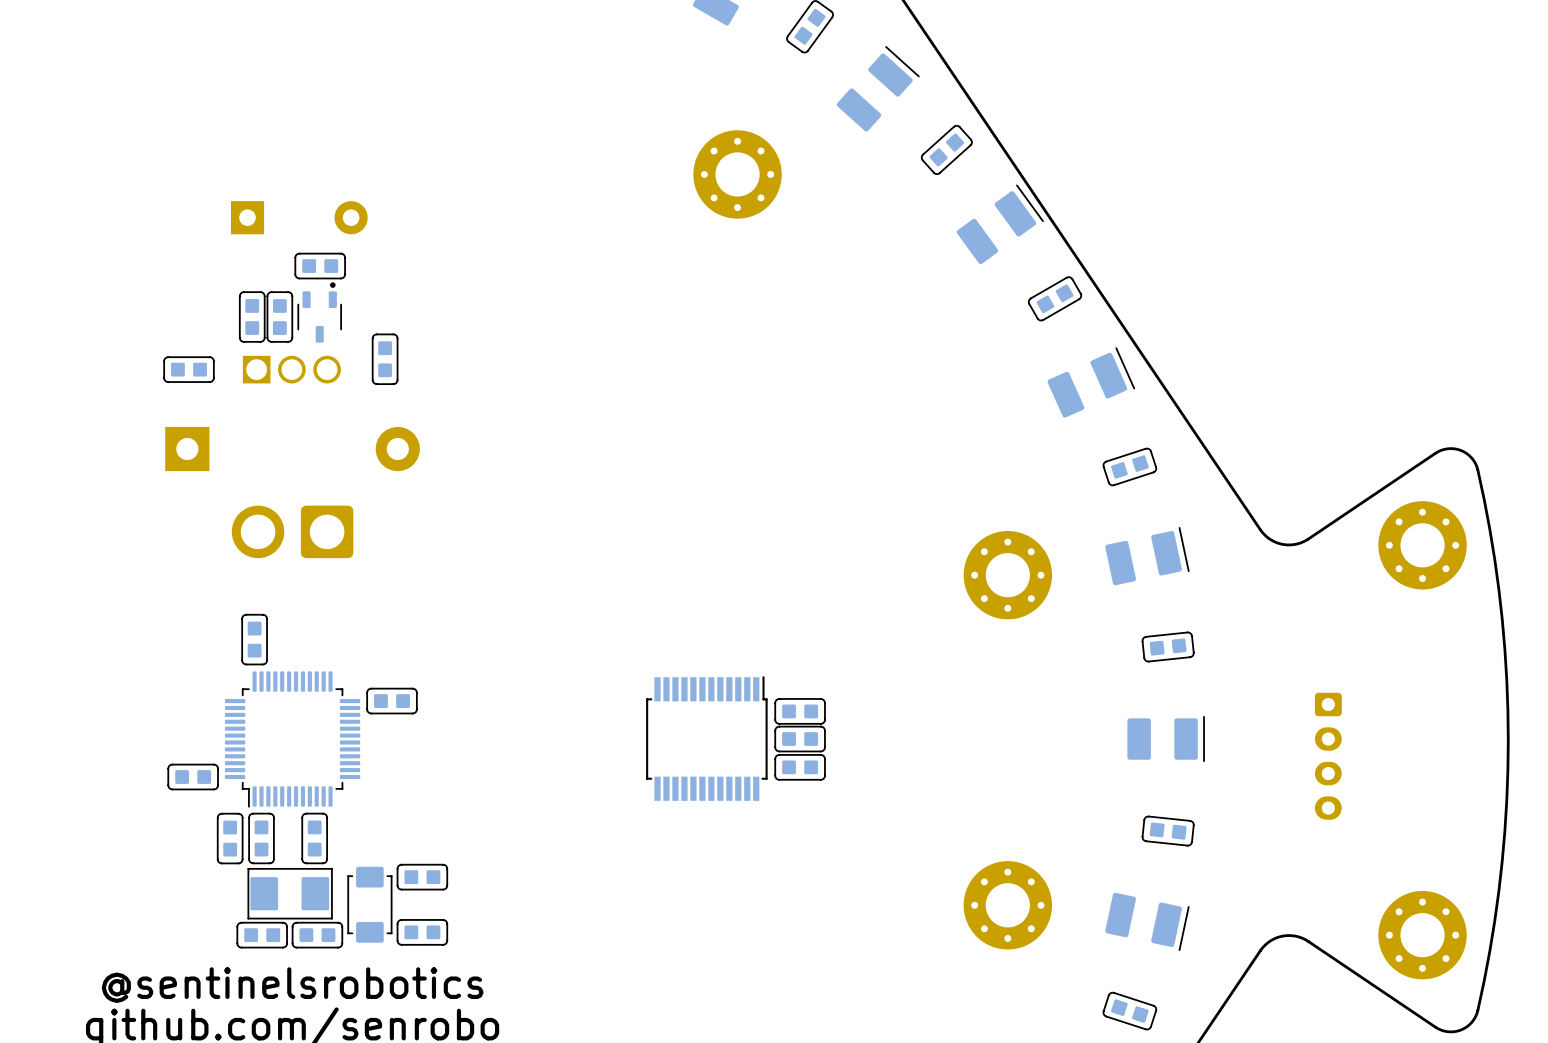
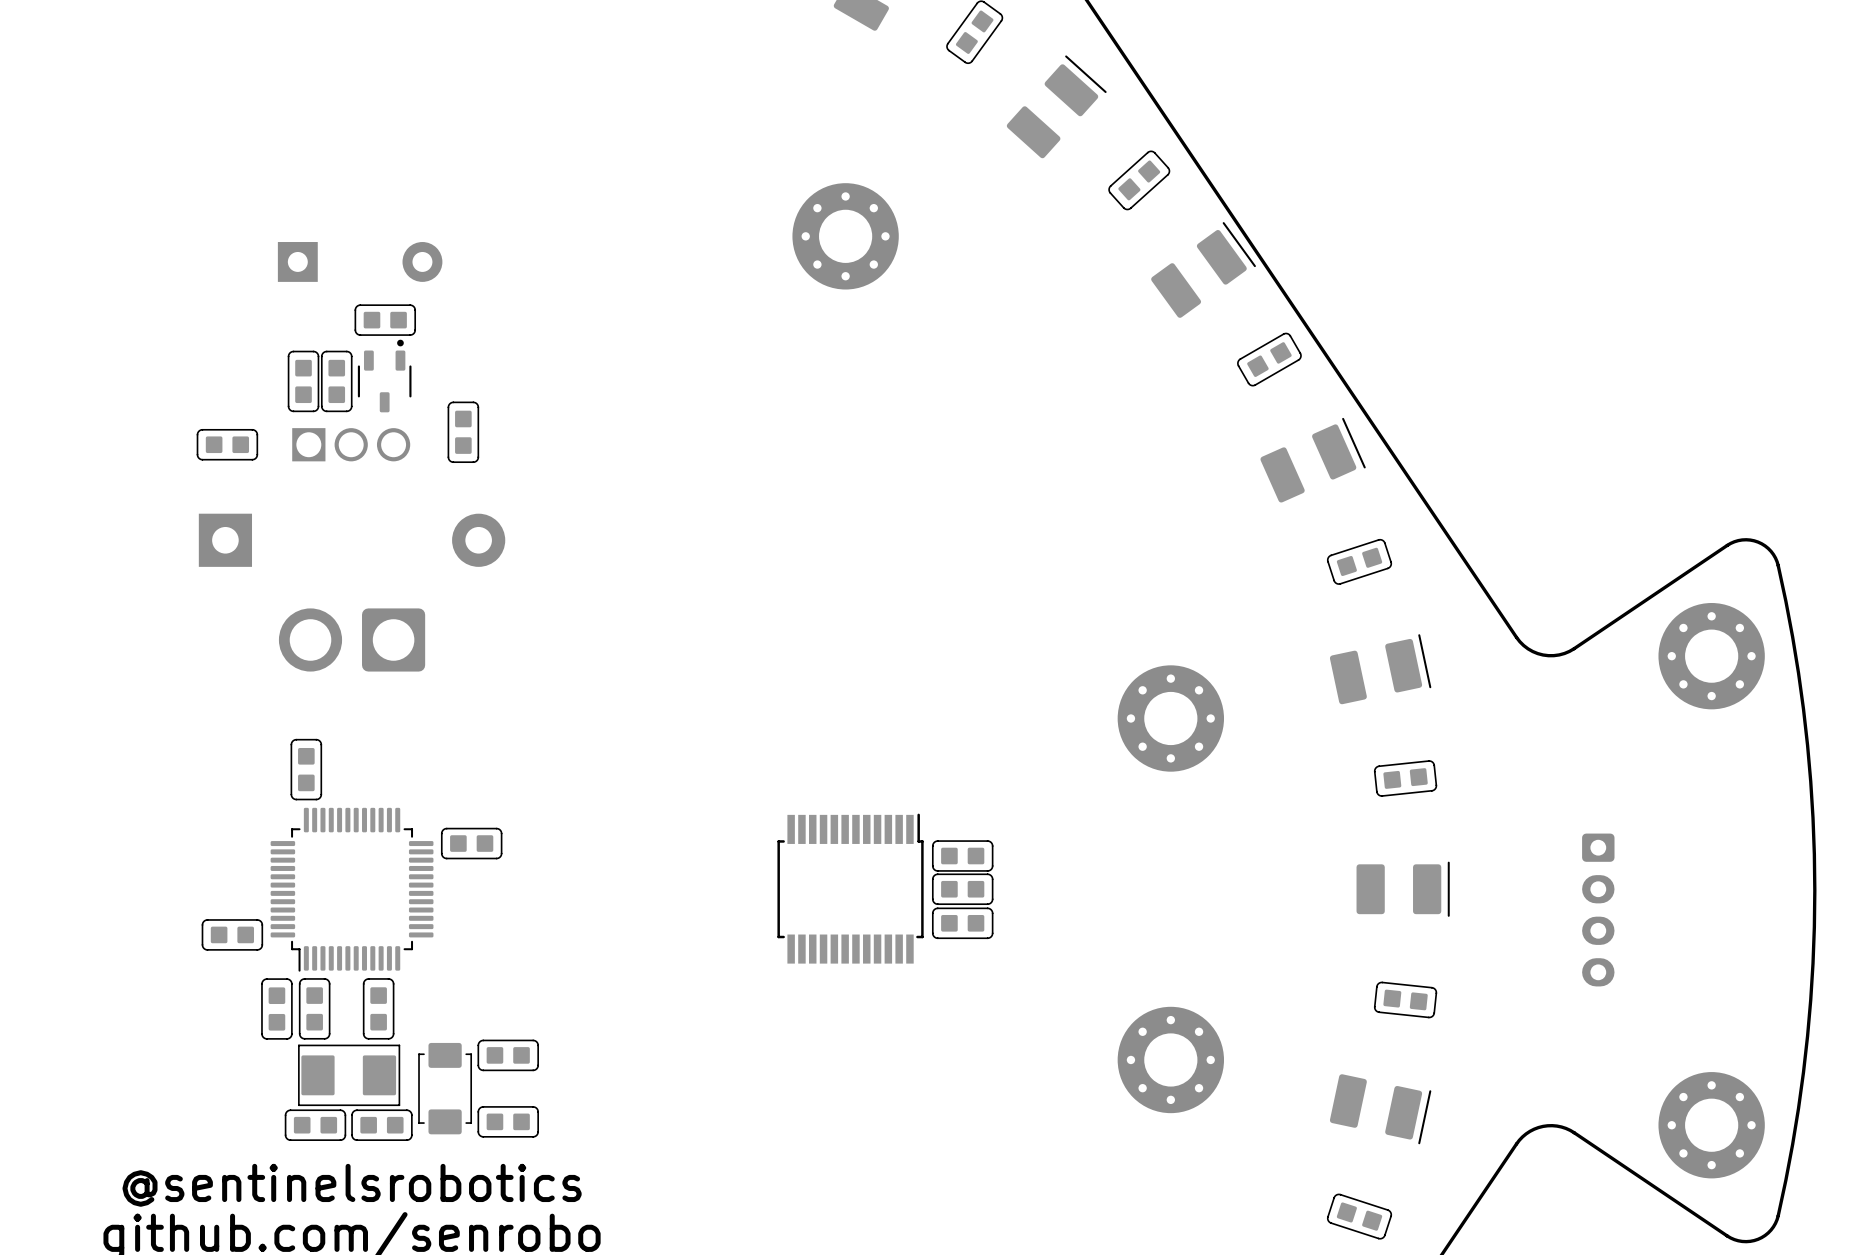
part position: (737, 174) -> (845, 236)
part position: (1007, 575) -> (1170, 718)
part position: (1007, 905) -> (1170, 1059)

